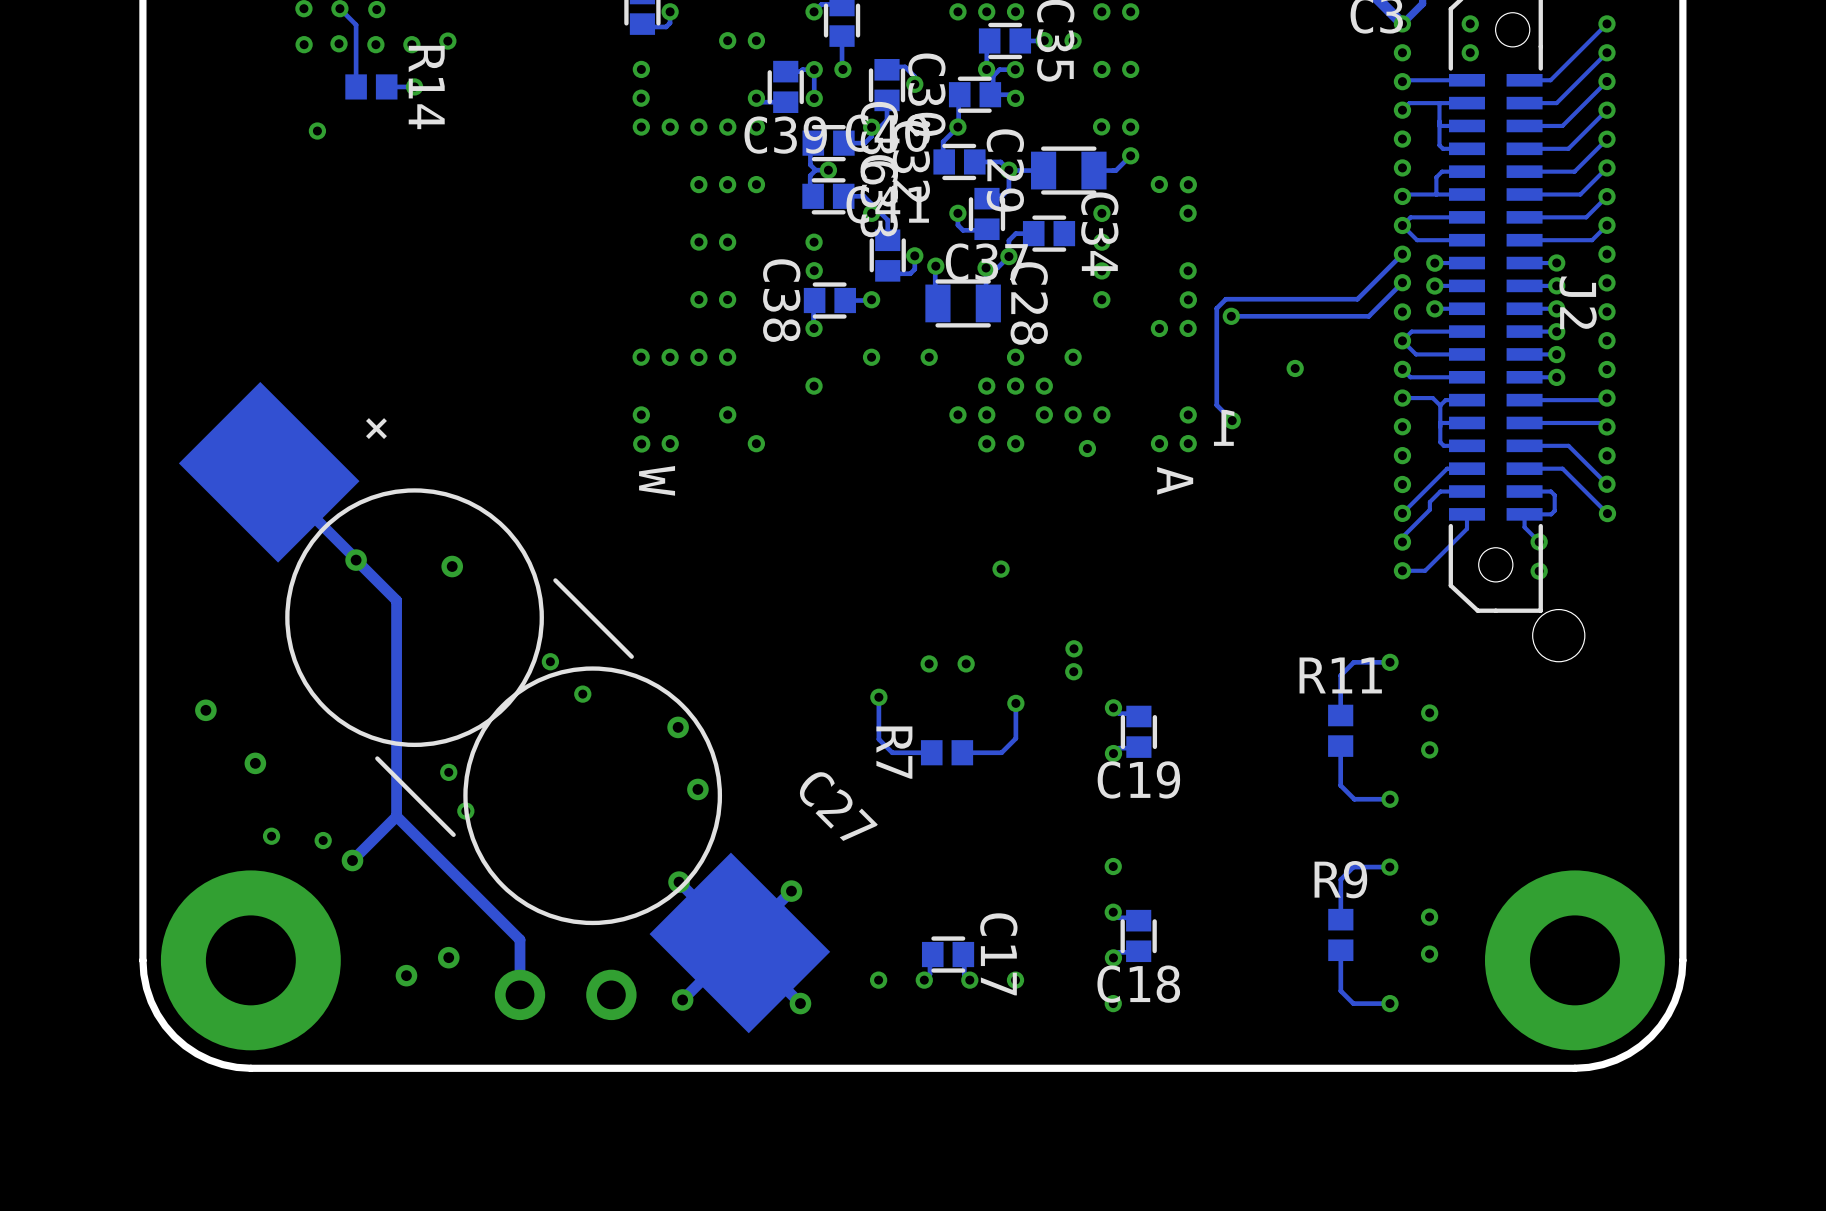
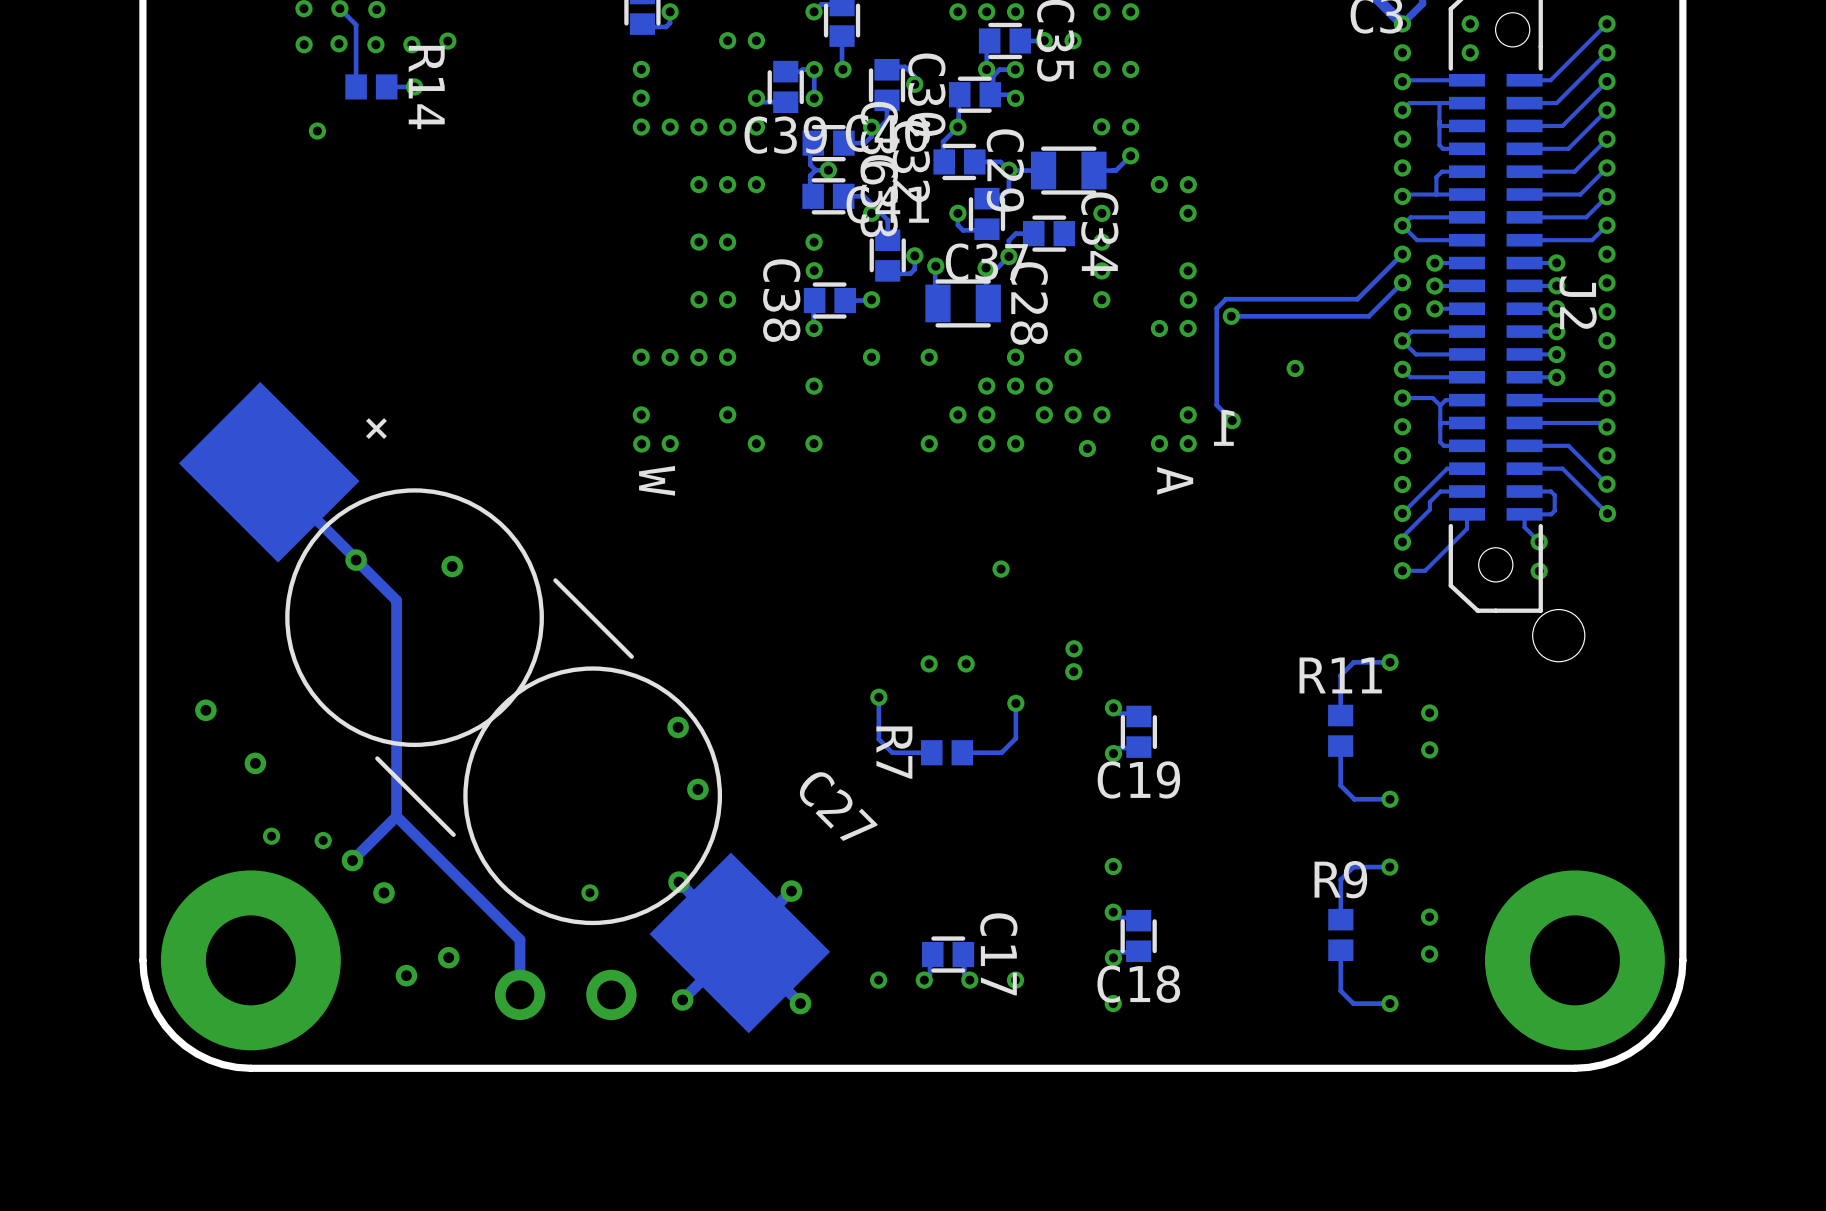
via: none -> (813, 443)
via: none -> (929, 443)
via: (550, 661) -> none
via: (582, 694) -> none
via: (448, 772) -> none
via: (465, 811) -> none
via: none -> (383, 892)
via: none -> (589, 892)

